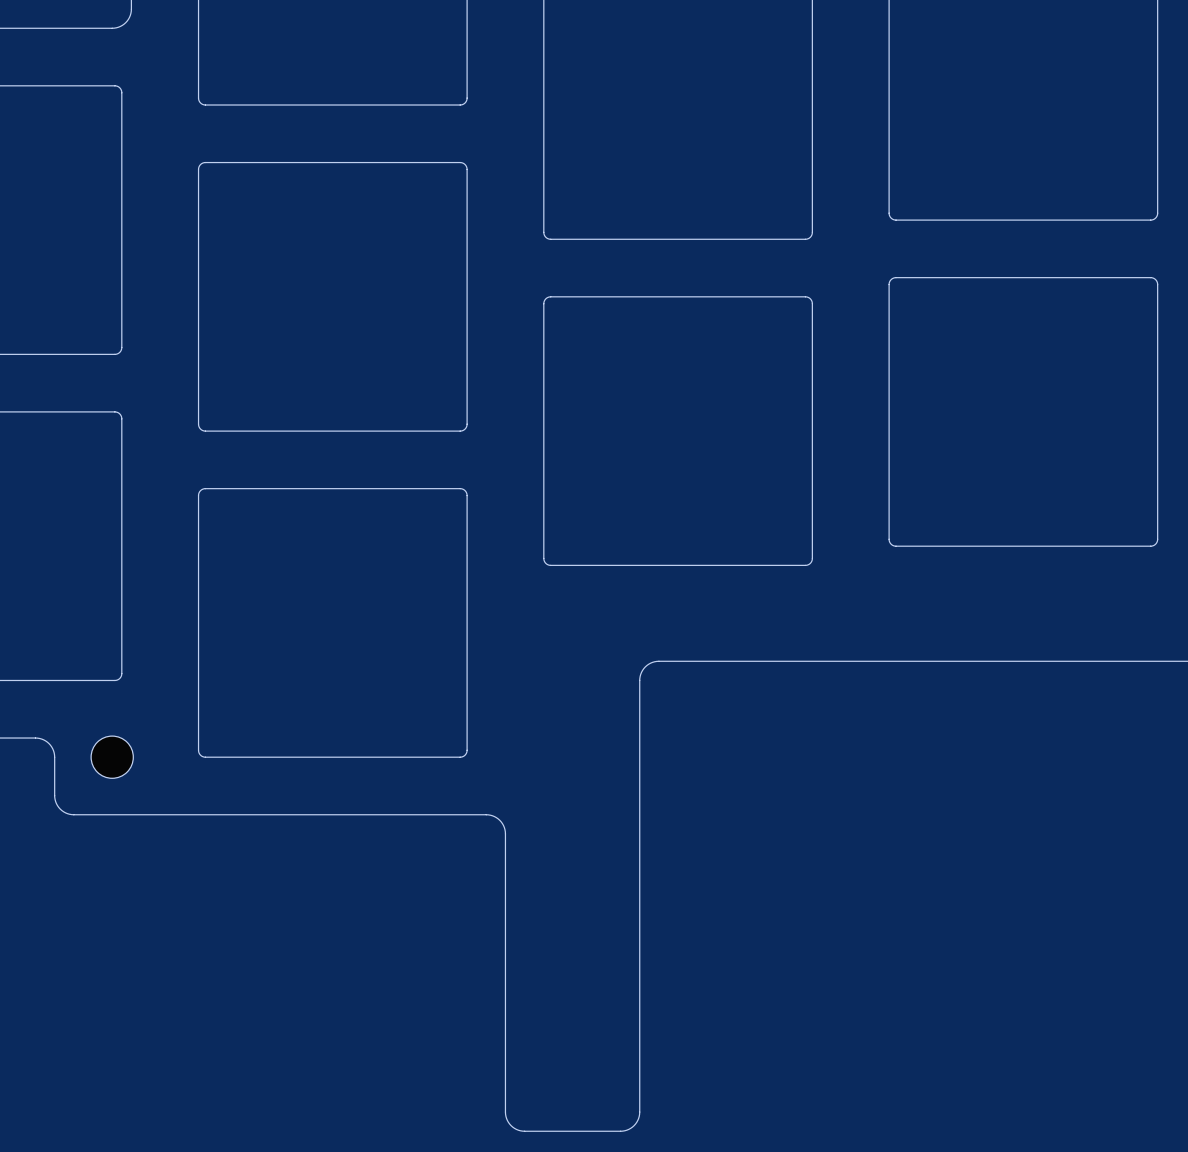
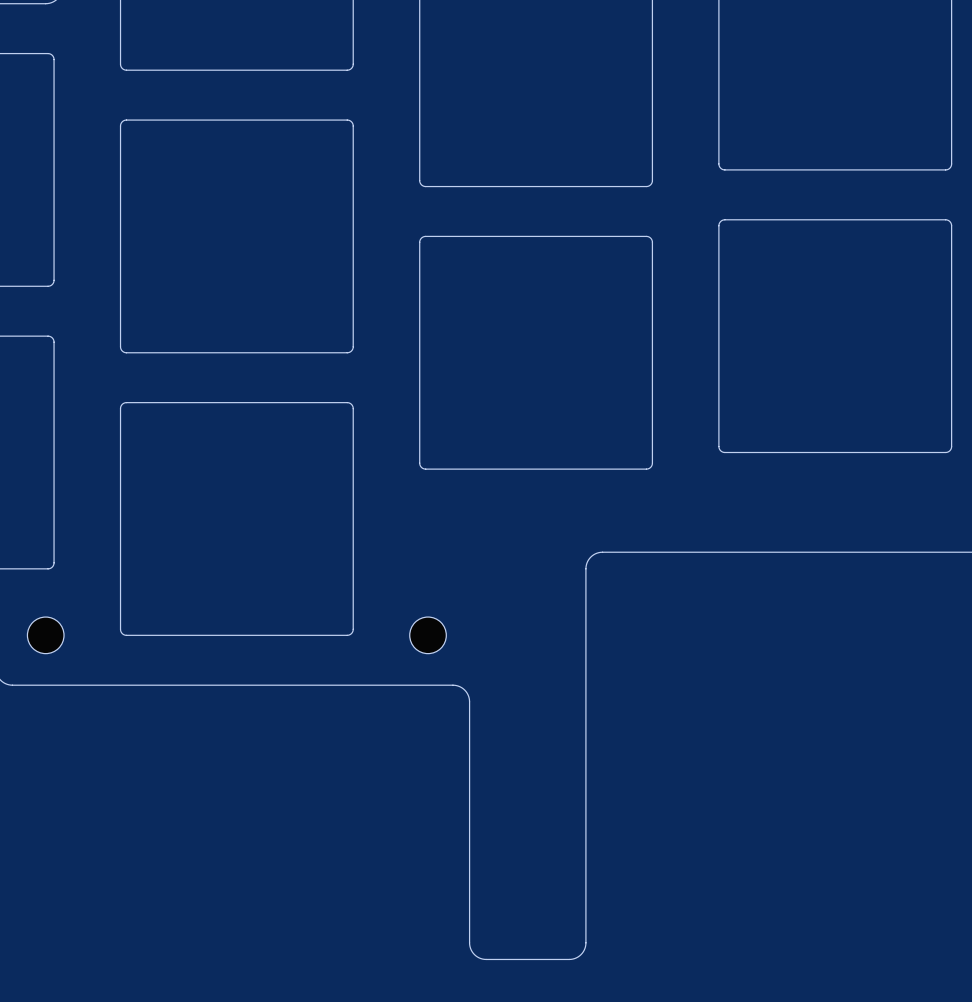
board edge: (754, 661) (656, 661) (645, 666) (640, 676) (639, 1112) (636, 1122) (628, 1129) (620, 1131) (522, 1131) (512, 1127) (507, 1120) (505, 1112) (505, 831) (499, 820) (486, 814) -> (602, 552) (590, 557) (586, 566) (585, 942) (584, 950) (578, 956) (569, 959) (486, 959) (478, 957) (473, 953) (469, 942) (468, 696) (463, 688) (454, 685) (369, 685)
part: none -> (428, 635)

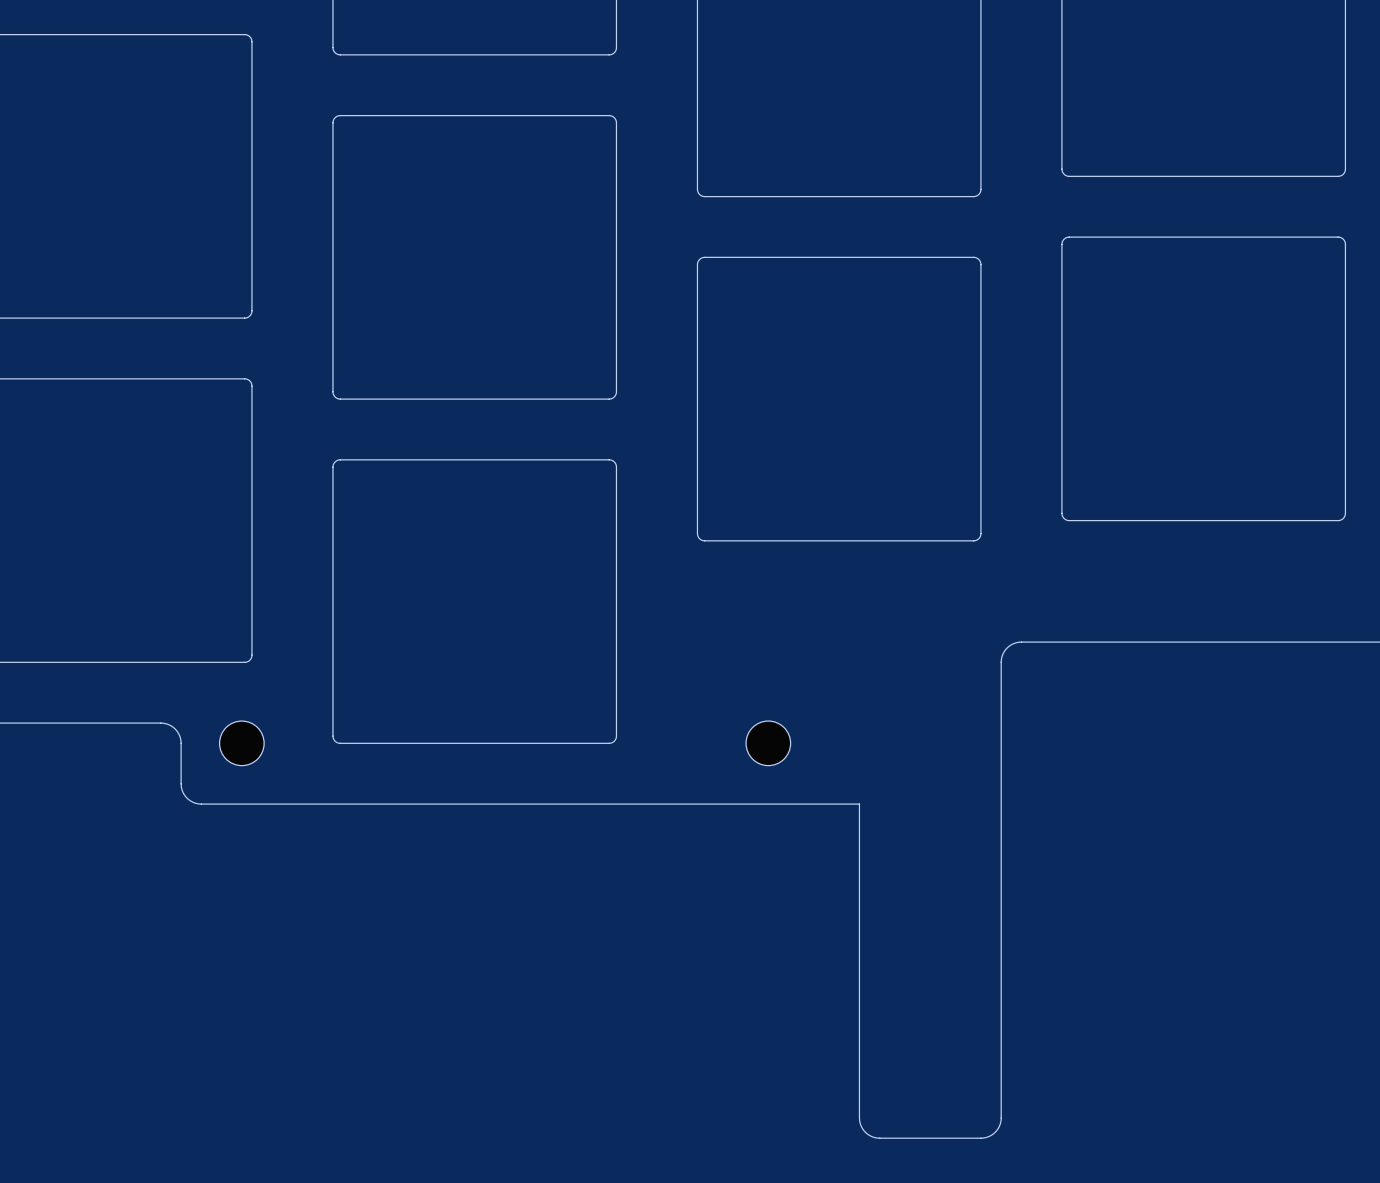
board edge: (685, 552) (600, 552) (590, 557) (586, 565) (585, 942) (583, 951) (576, 957) (569, 959) (484, 959) (475, 955) (471, 950) (469, 942) (469, 699) (464, 690) (452, 685) -> (1021, 642) (1012, 644) (1007, 648) (1001, 660) (1001, 1117) (999, 1126) (991, 1135) (980, 1138) (879, 1138) (870, 1136) (863, 1130) (859, 1117) (859, 804) (737, 804)
part position: (428, 635) -> (768, 743)

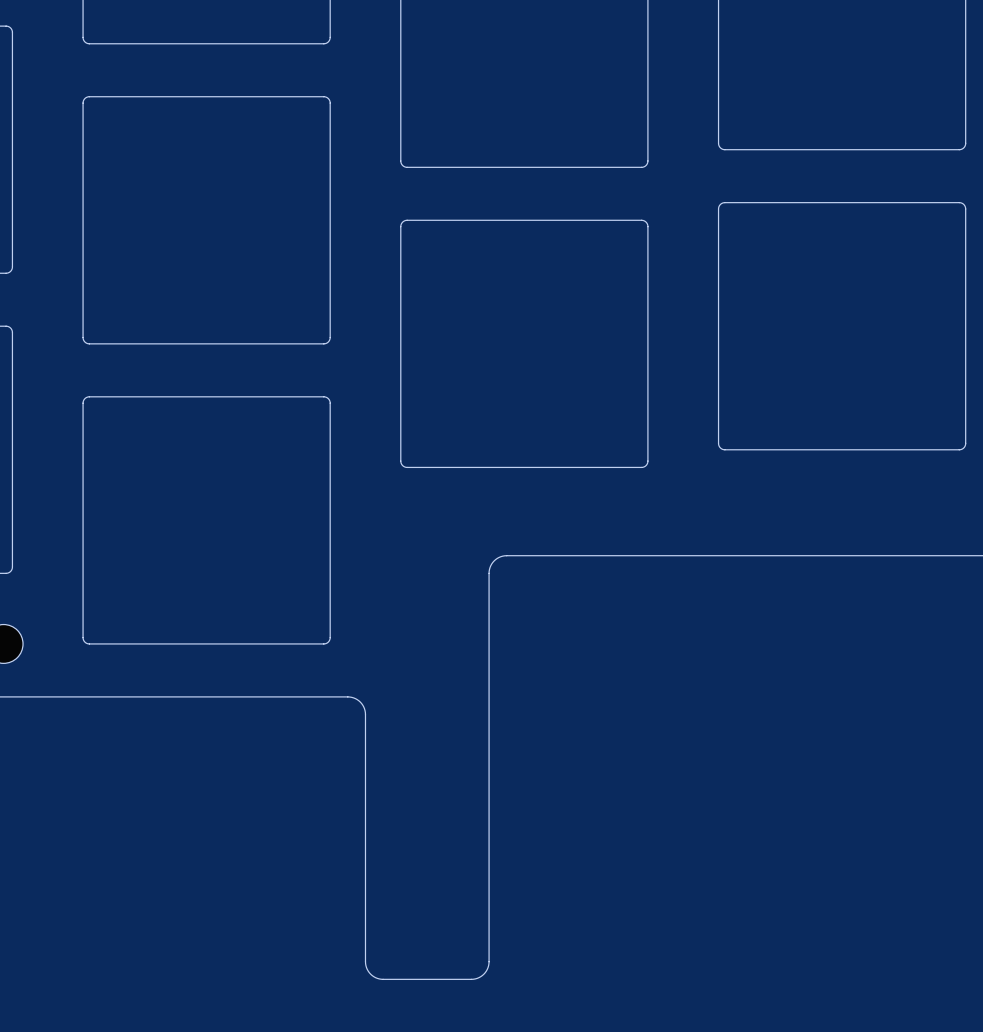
board edge: (1021, 642) (1012, 644) (1007, 648) (1001, 660) (1001, 1117) (998, 1128) (989, 1136) (980, 1138) (877, 1138) (867, 1133) (860, 1124) (859, 804) (636, 804) -> (683, 555) (506, 555) (497, 558) (490, 565) (489, 573) (489, 961) (486, 971) (479, 977) (471, 979) (381, 979) (372, 975) (367, 969) (365, 961) (365, 712) (360, 702) (347, 696)
part: (768, 743) -> none

